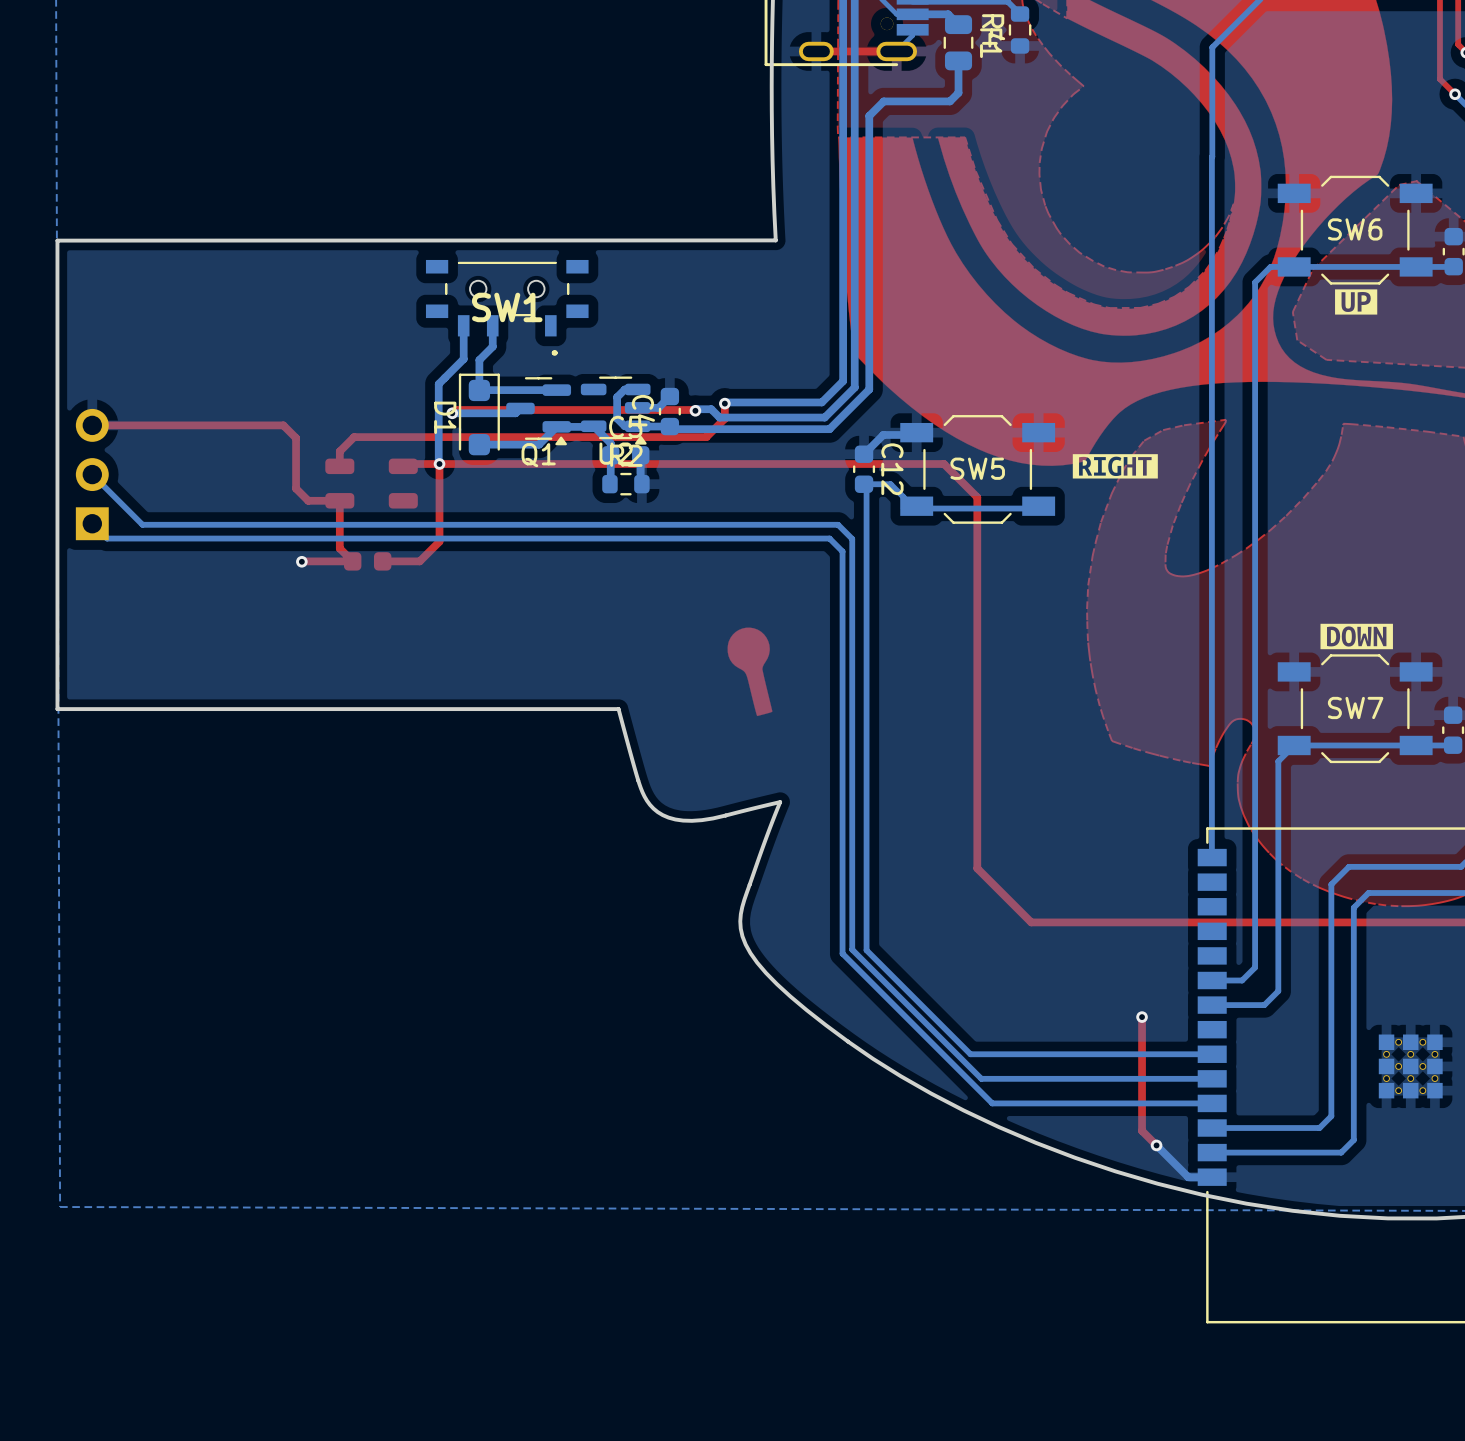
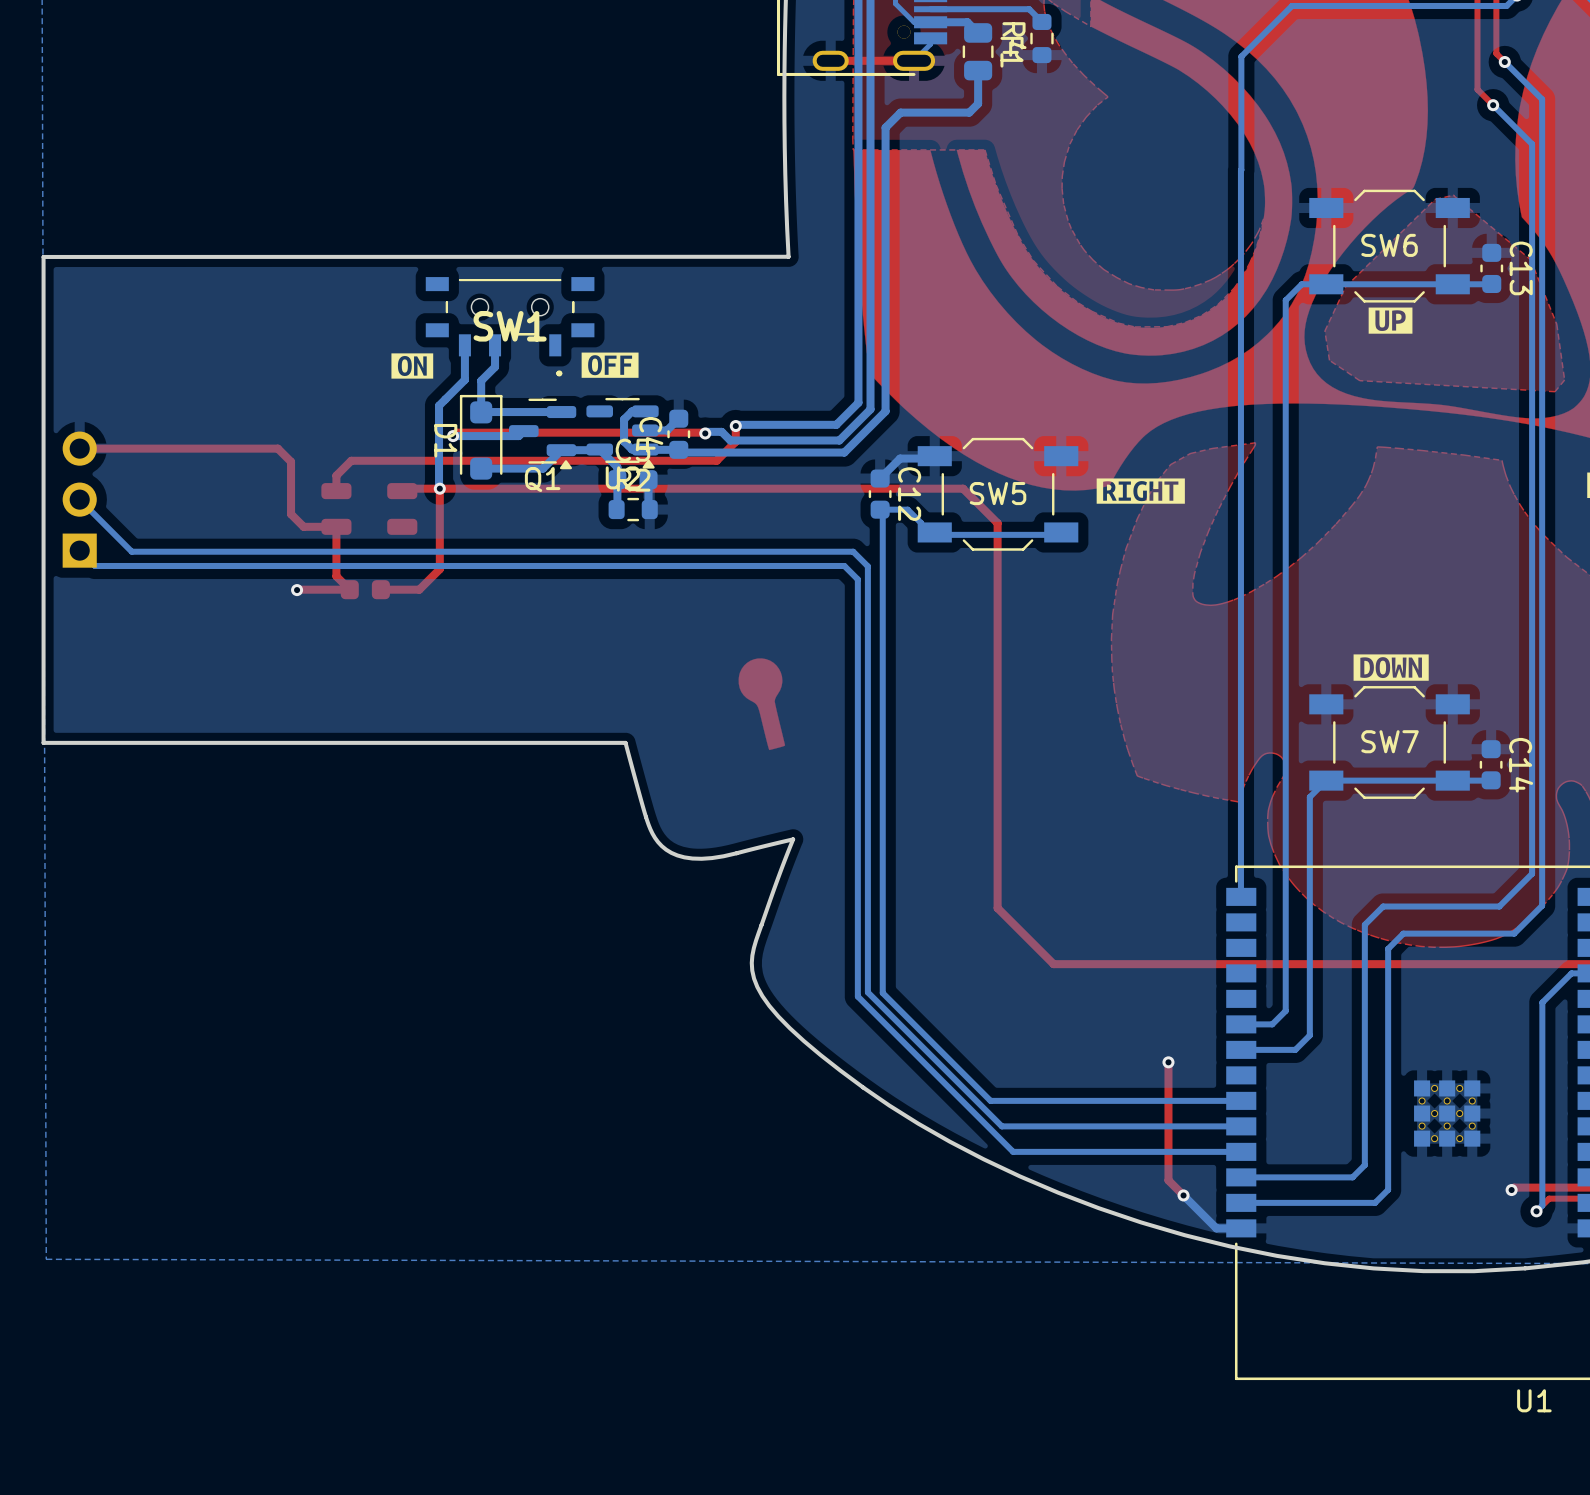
drawing: none -> [581, 352, 639, 378]
drawing: none -> [391, 353, 434, 379]

